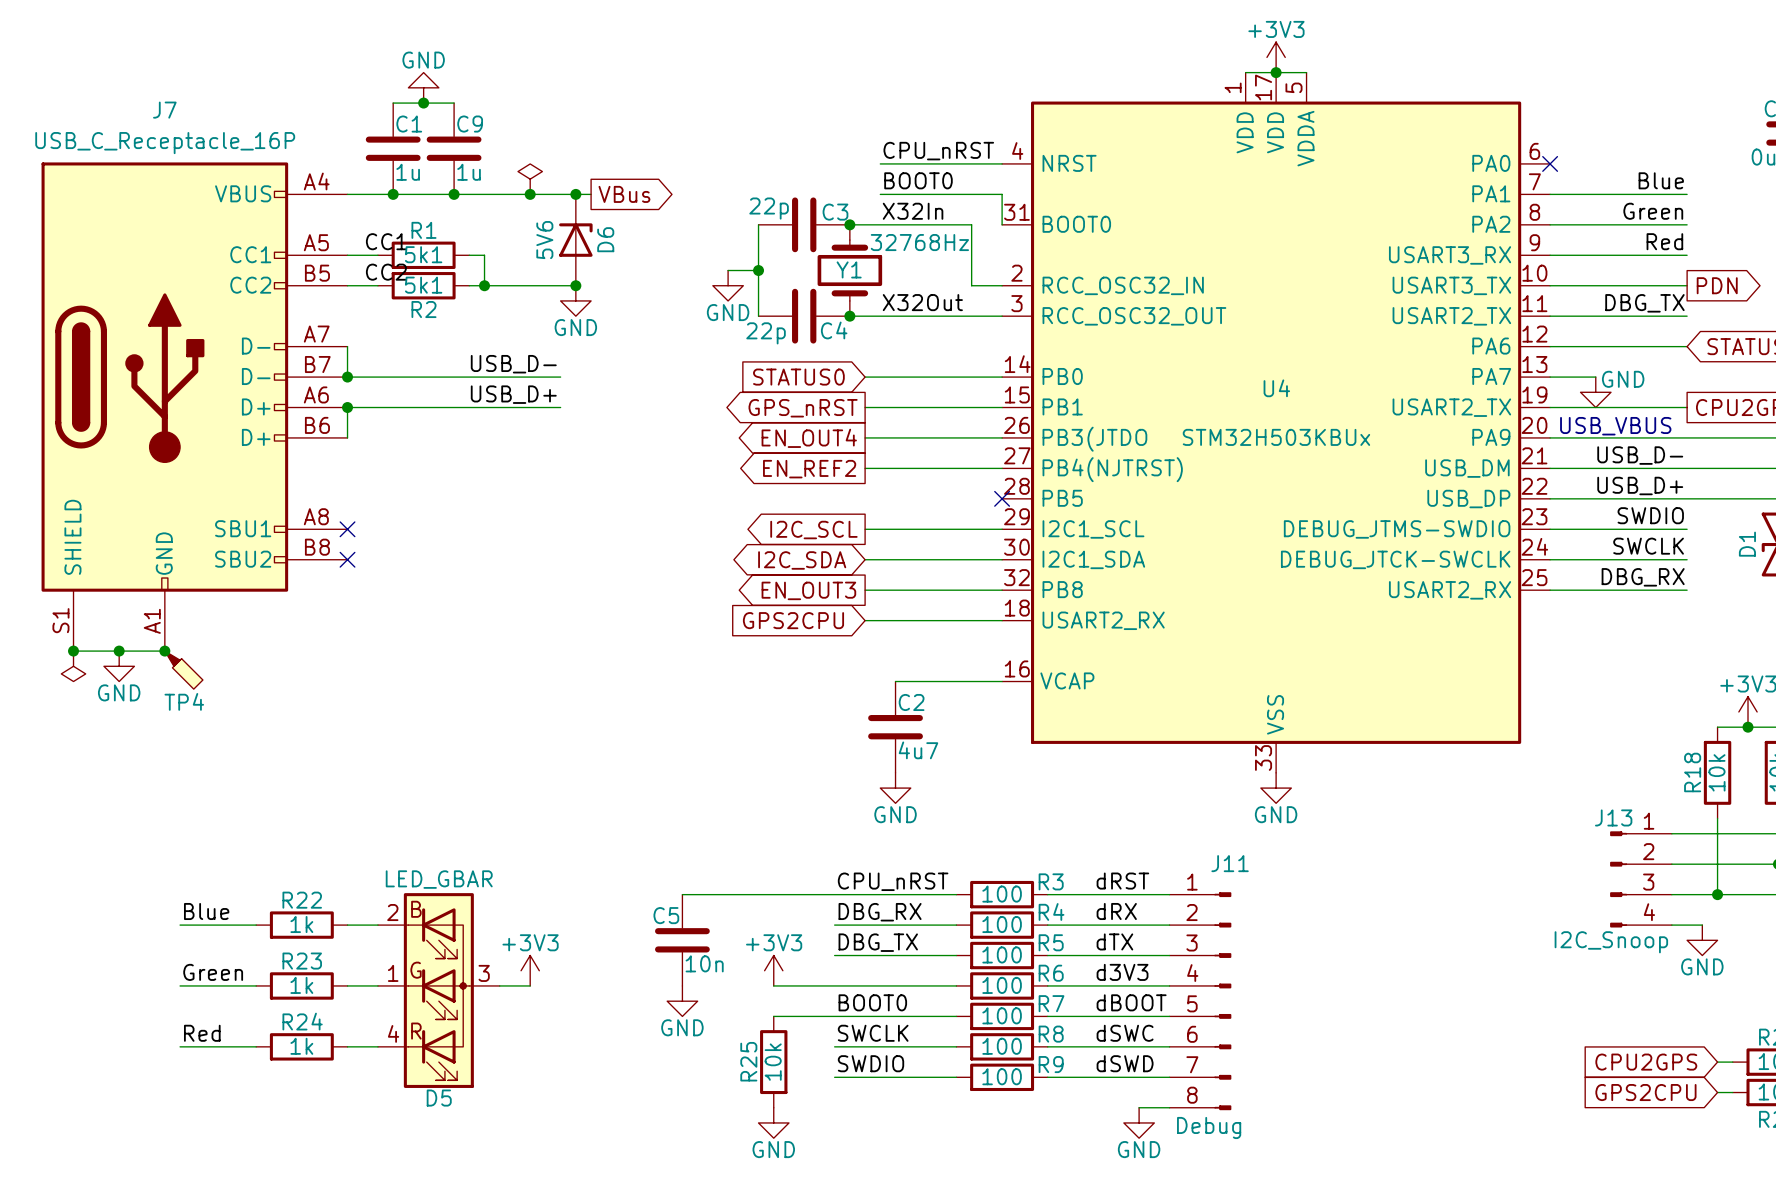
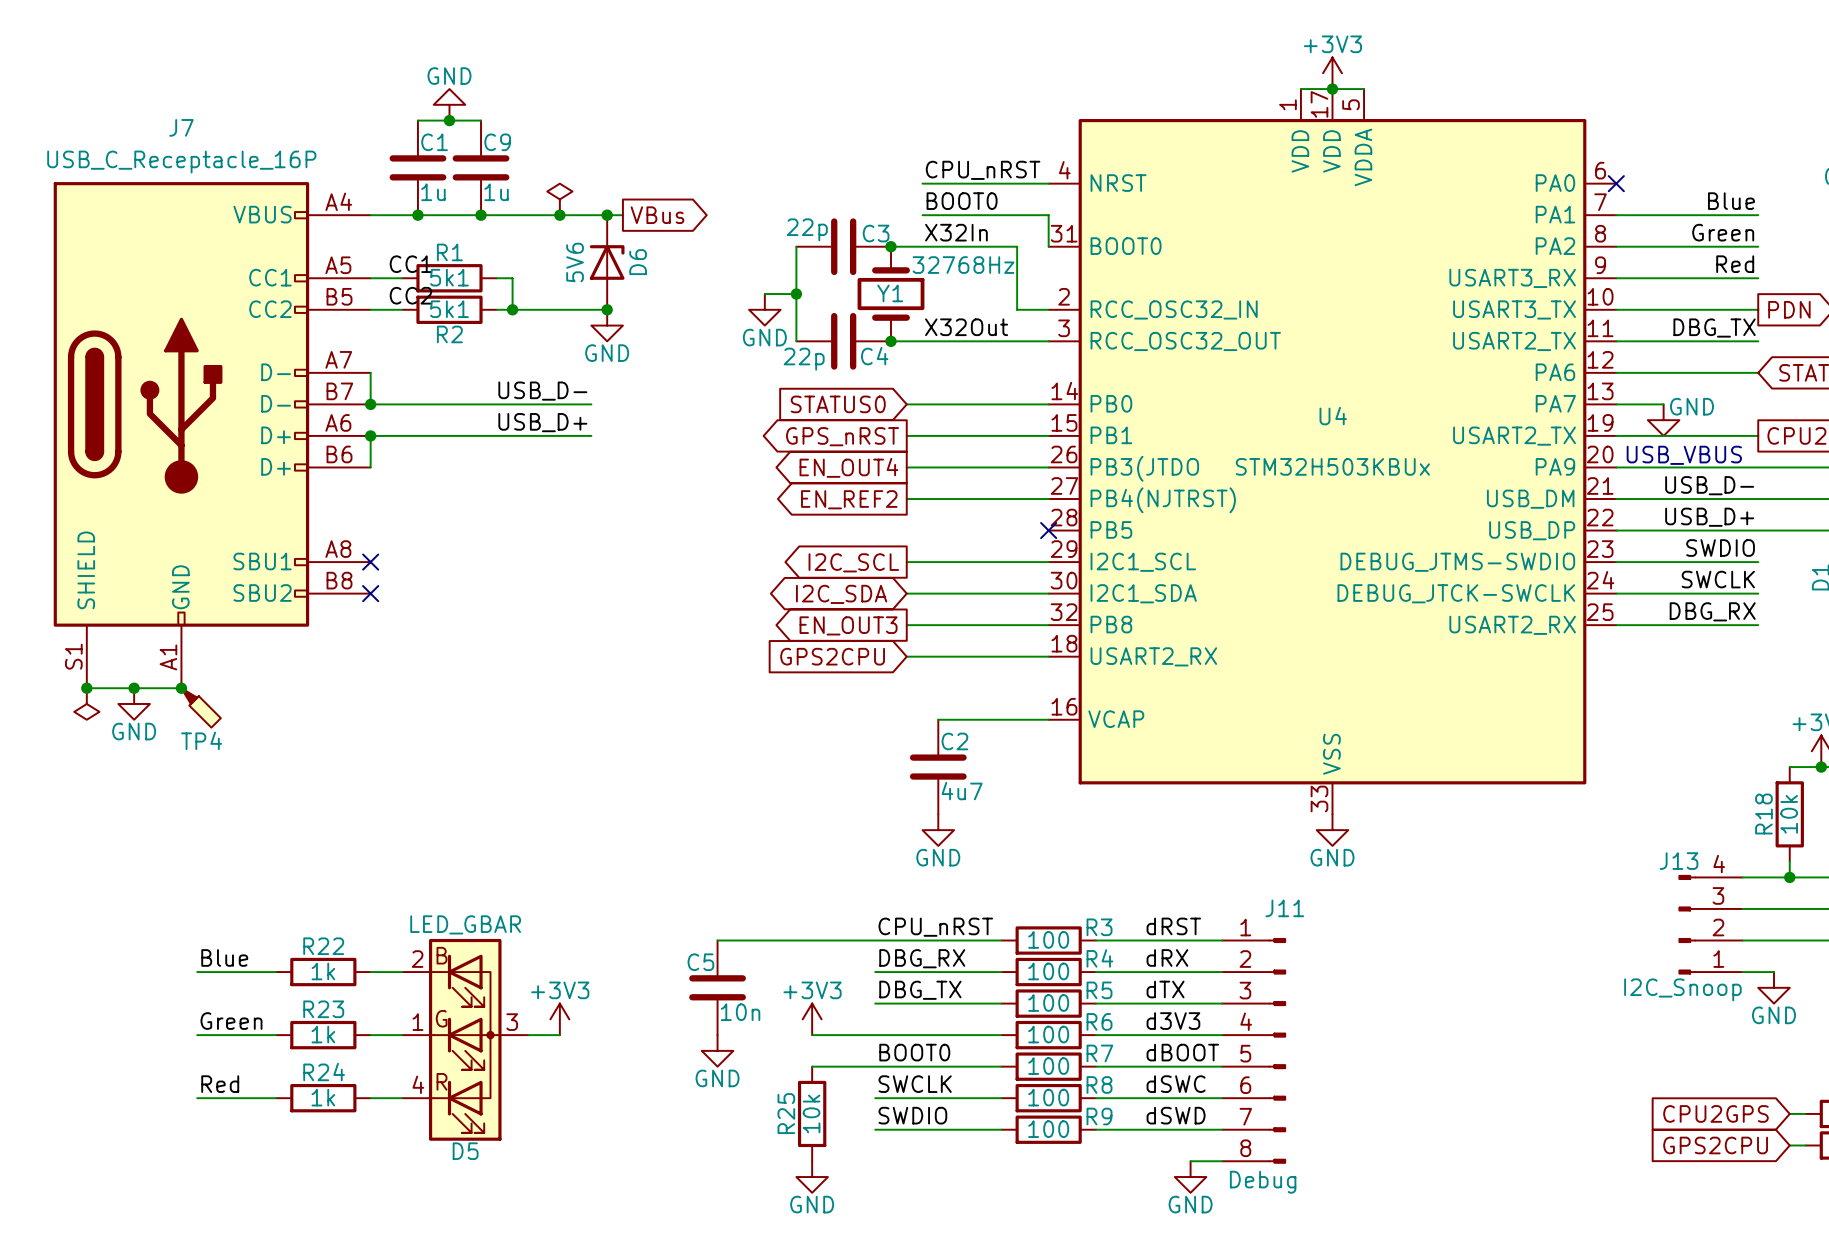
wire: (1717, 833) (1717, 894) -> none
J13 flip: as is (1618, 879) -> up-down (1687, 924)
junction position: (1717, 894) -> (1789, 877)

